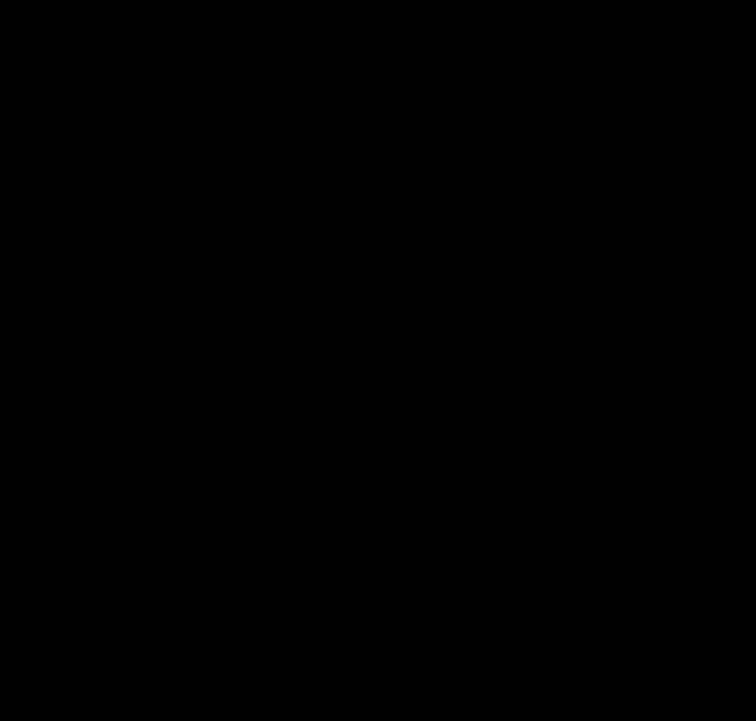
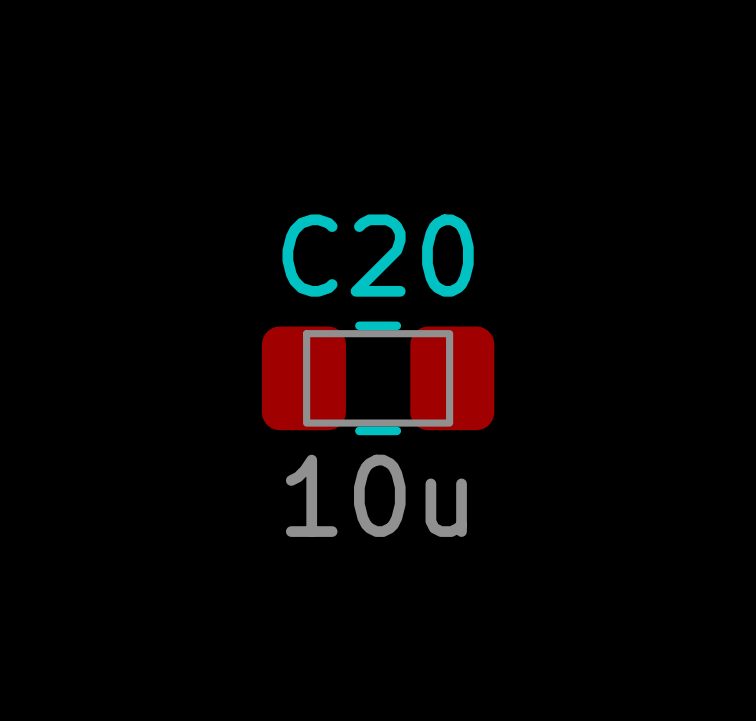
C20: none -> 10u (378, 378)

